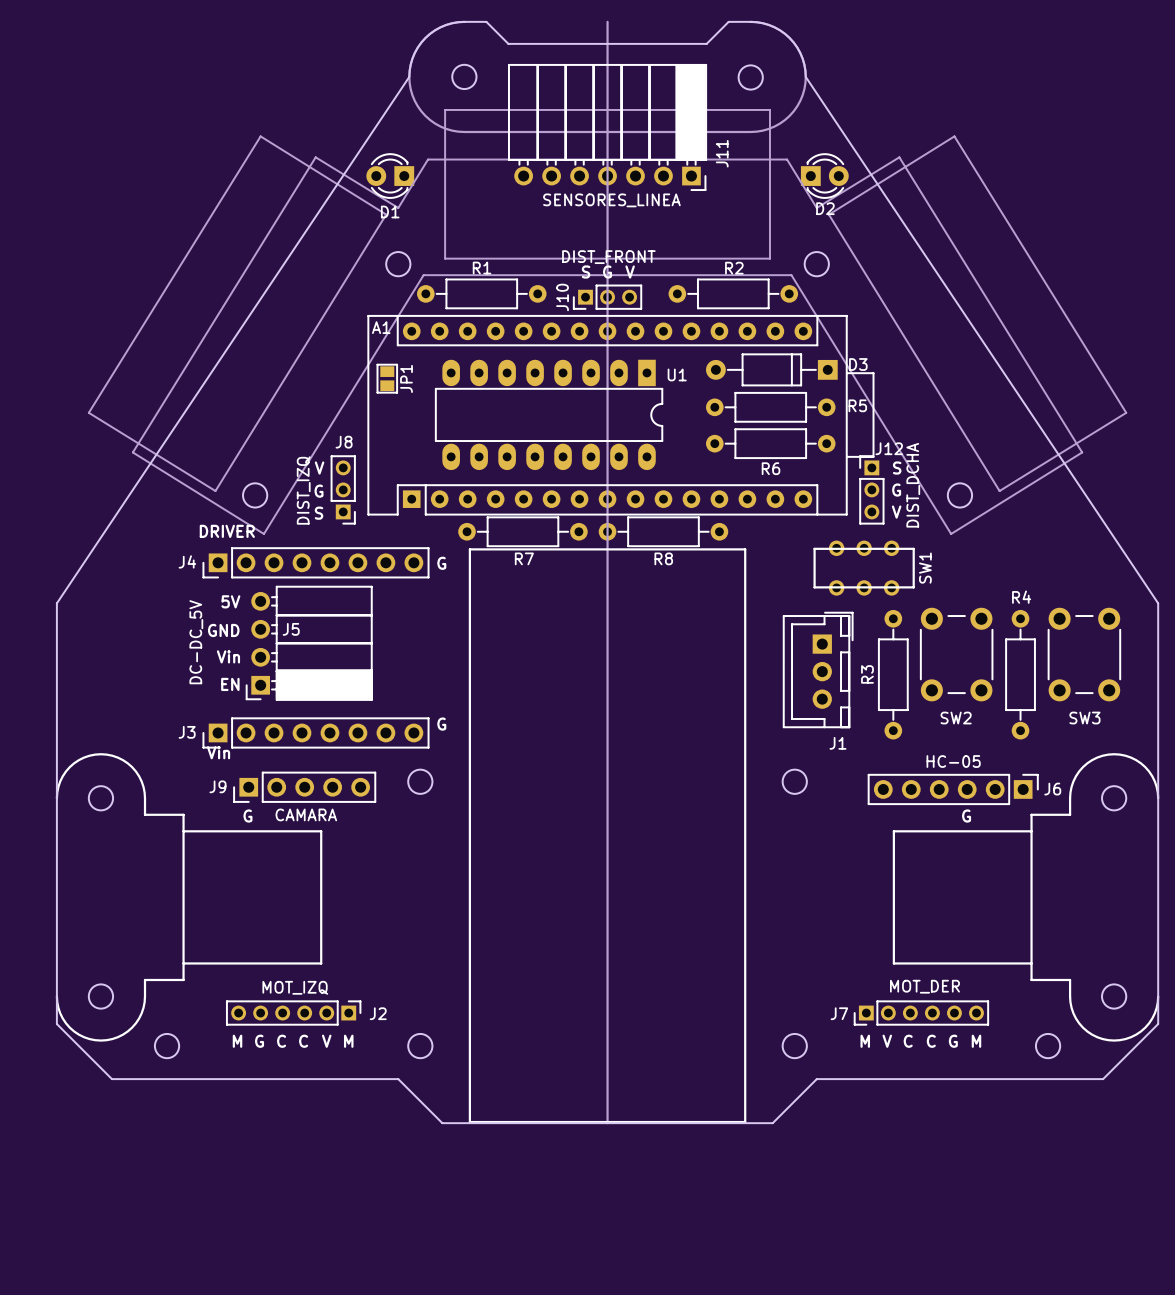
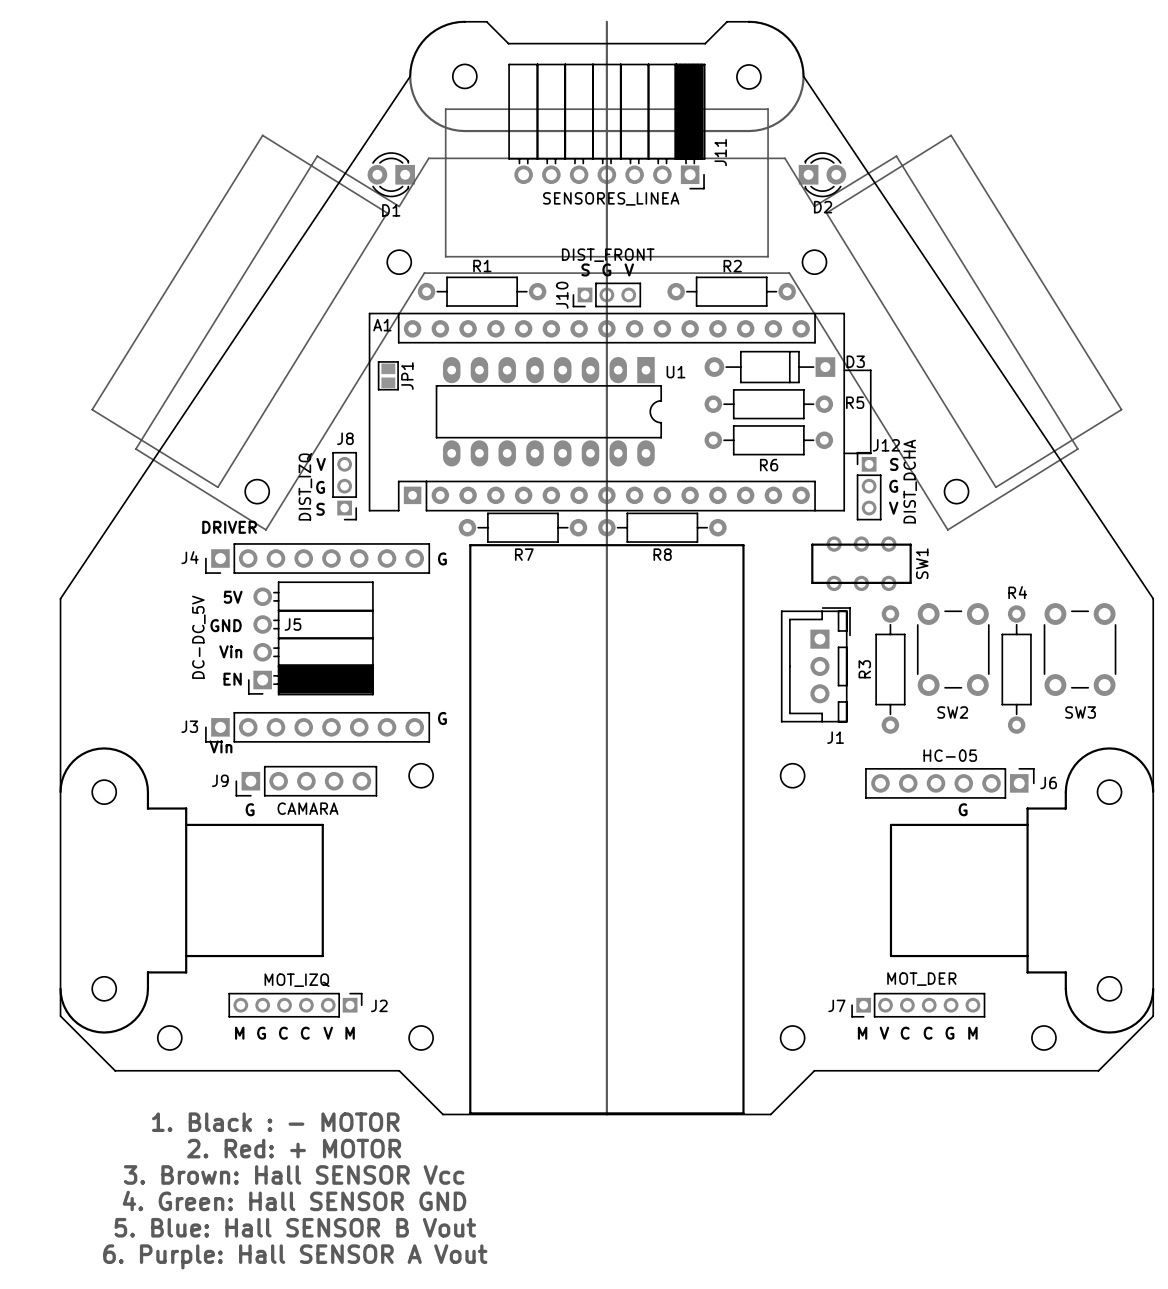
text: none -> 1. Black : - MOTOR (275, 1122)
text: none -> 2. Red: + MOTOR (294, 1148)
text: none -> 3. Brown: Hall SENSOR Vcc (294, 1174)
text: none -> 4. Green: Hall SENSOR GND (294, 1200)
text: none -> 5. Blue: Hall SENSOR B Vout (295, 1227)
text: none -> 6. Purple: Hall SENSOR A Vout (295, 1256)

